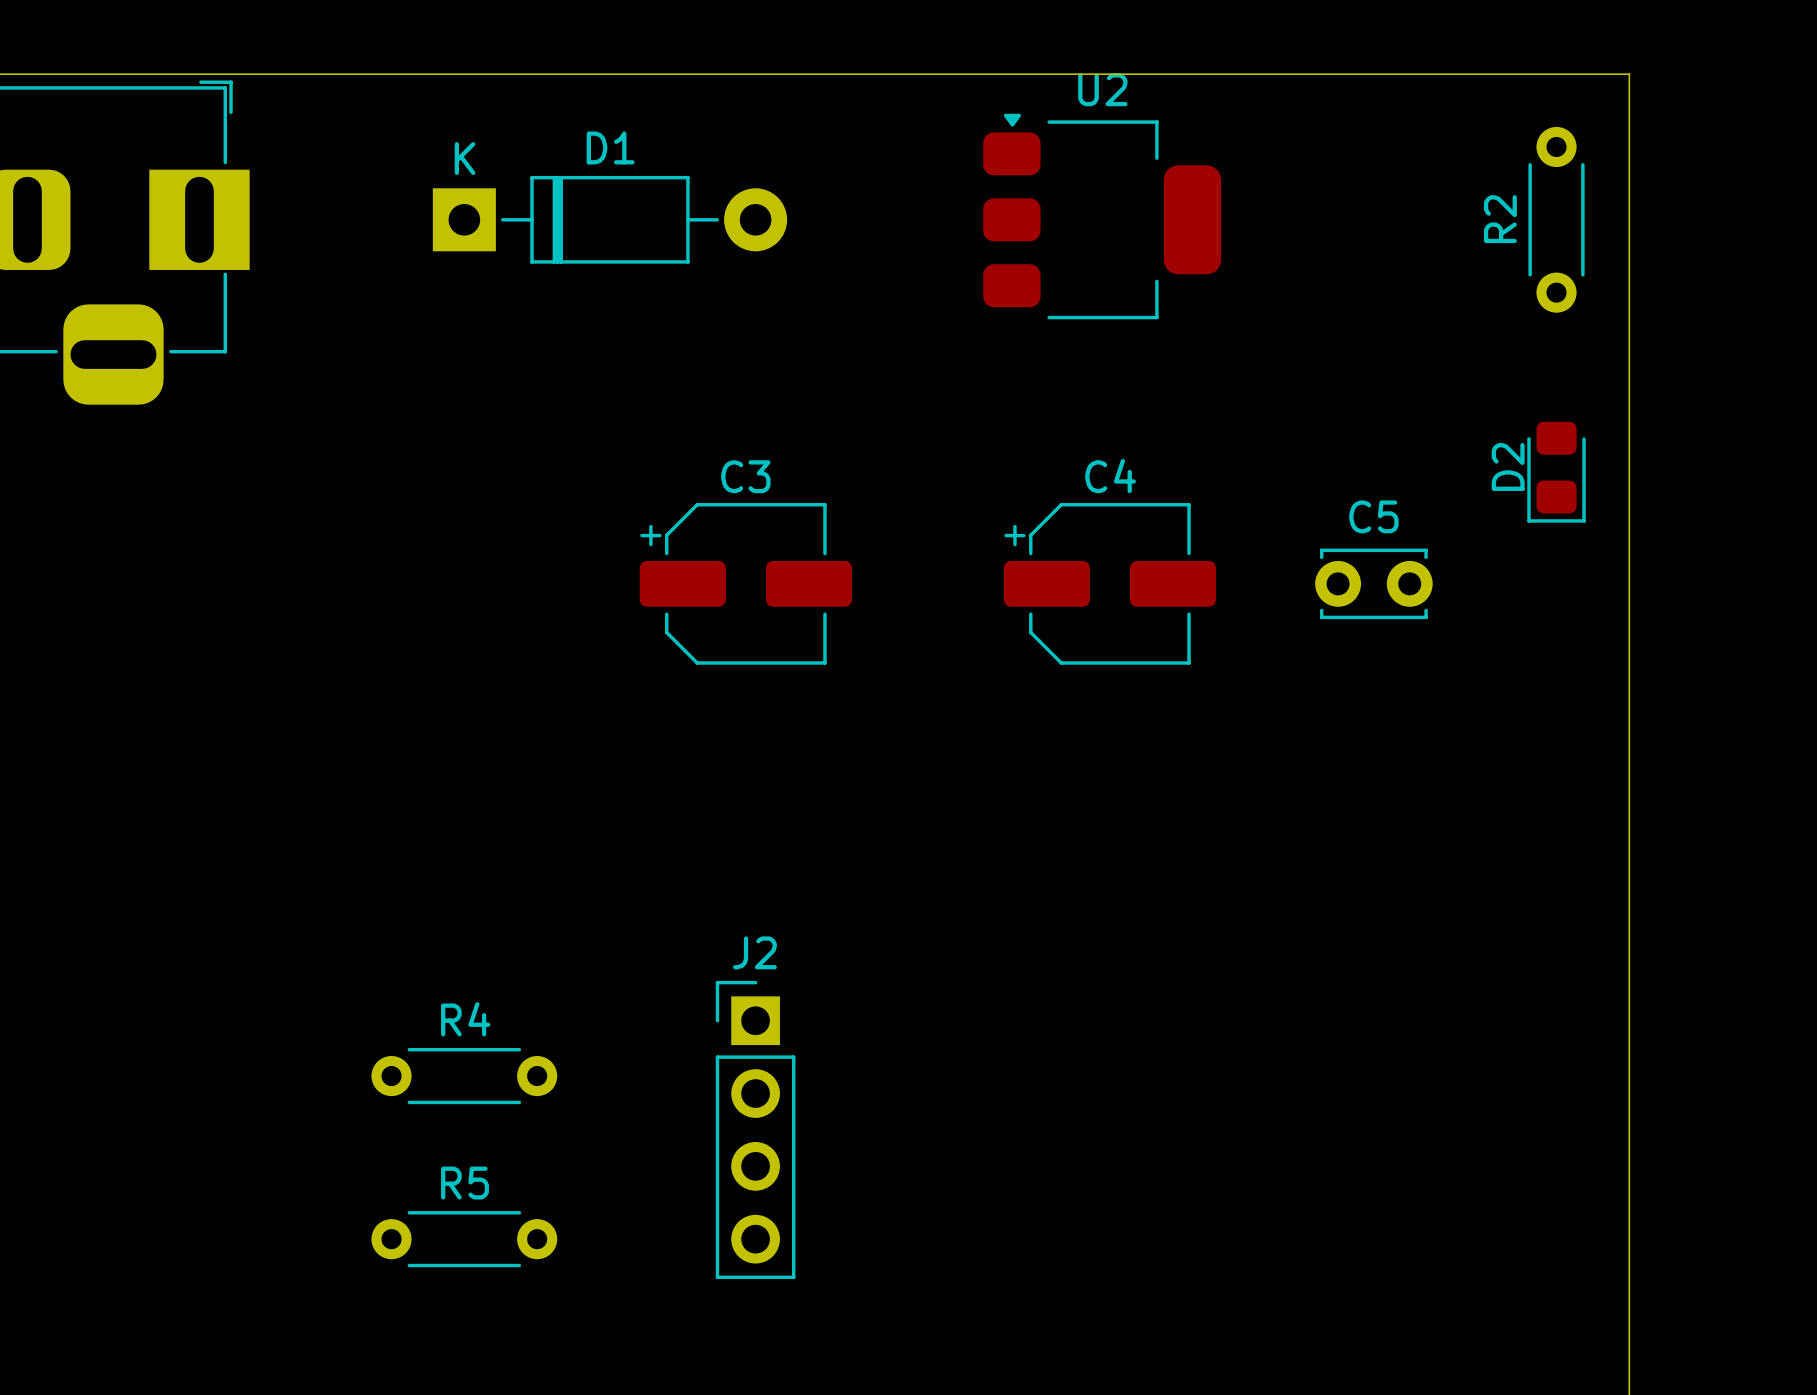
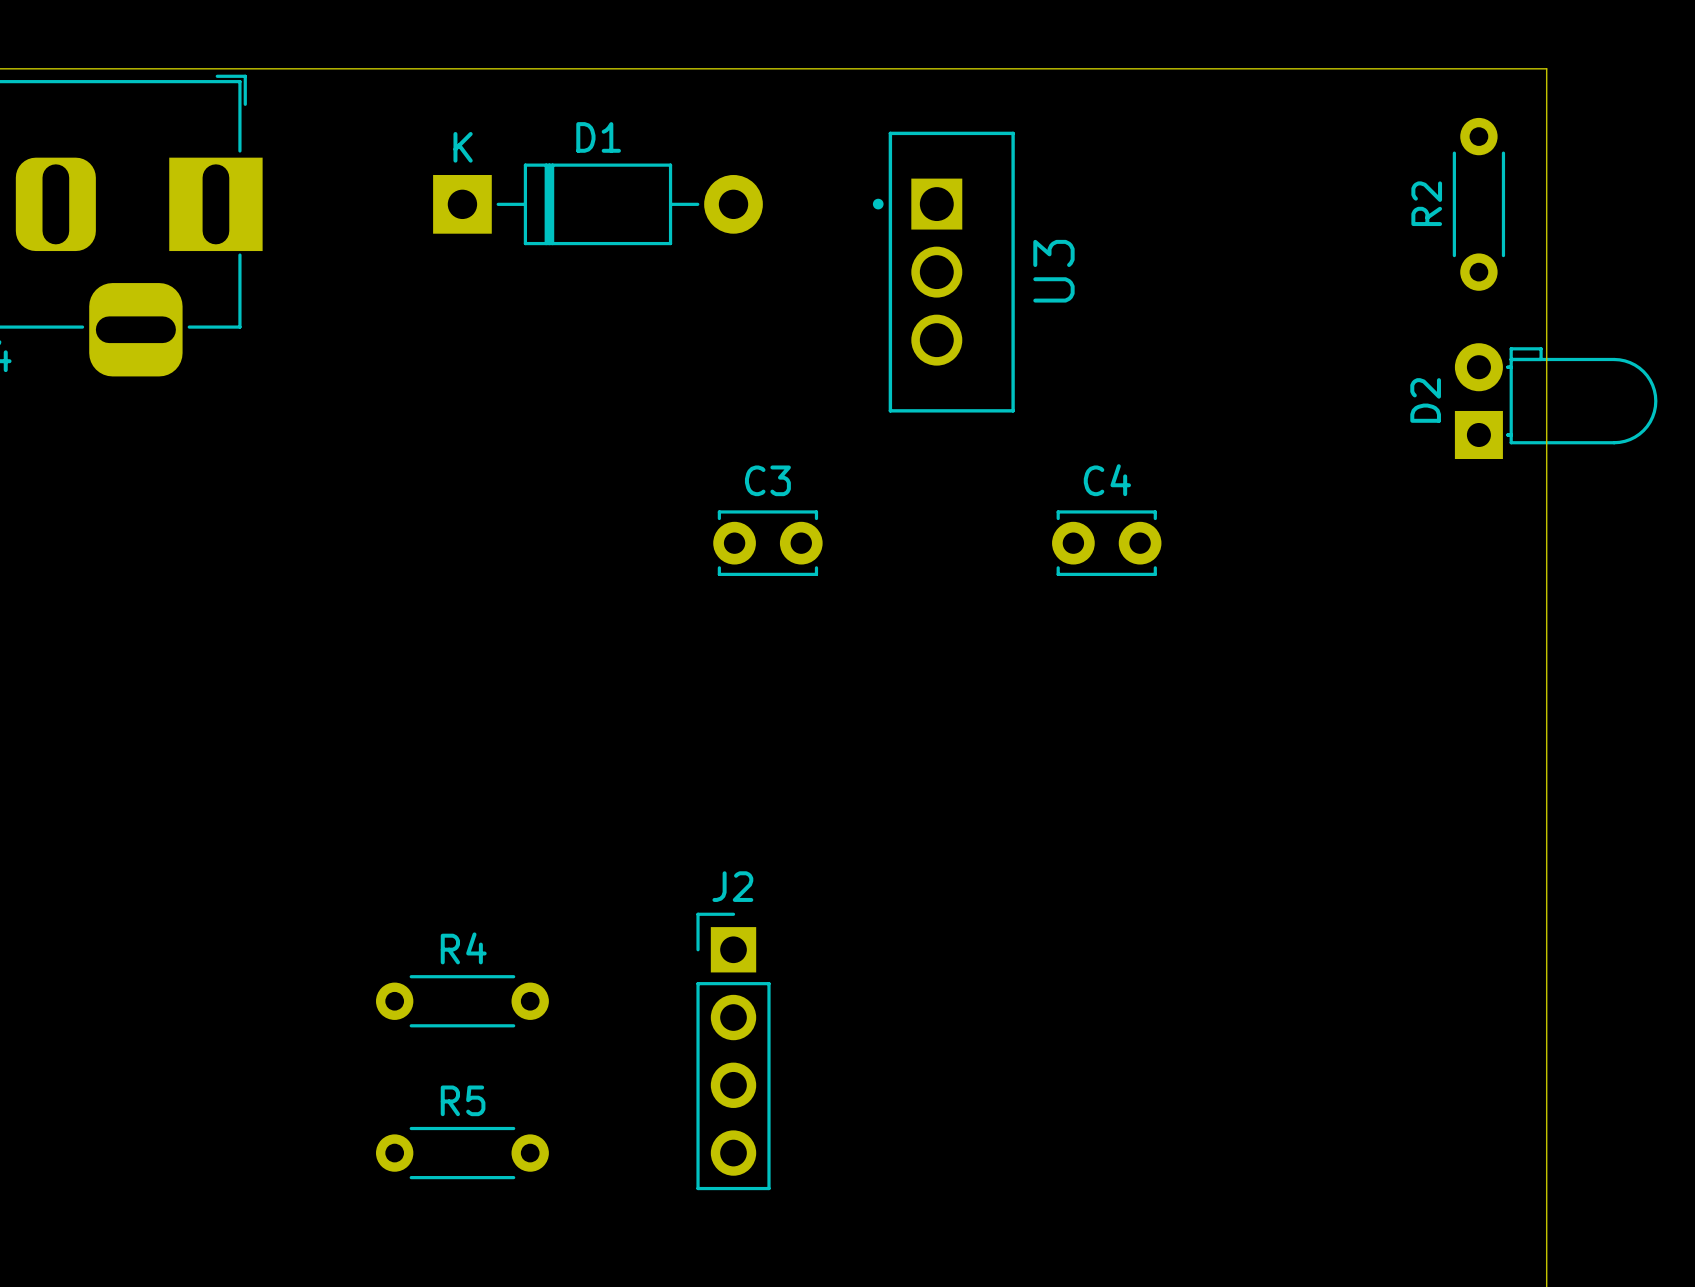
U2: (1102, 216) -> none
U3: none -> (943, 272)
D2 footprint: [1527, 421, 1586, 523] -> [1454, 343, 1658, 460]
D2 name position: D2 (1508, 466) -> D2 (1425, 400)
C3 footprint: [639, 503, 852, 665] -> [713, 510, 823, 576]
C4 footprint: [1003, 503, 1216, 665] -> [1052, 510, 1162, 576]
C5: (1373, 583) -> none

